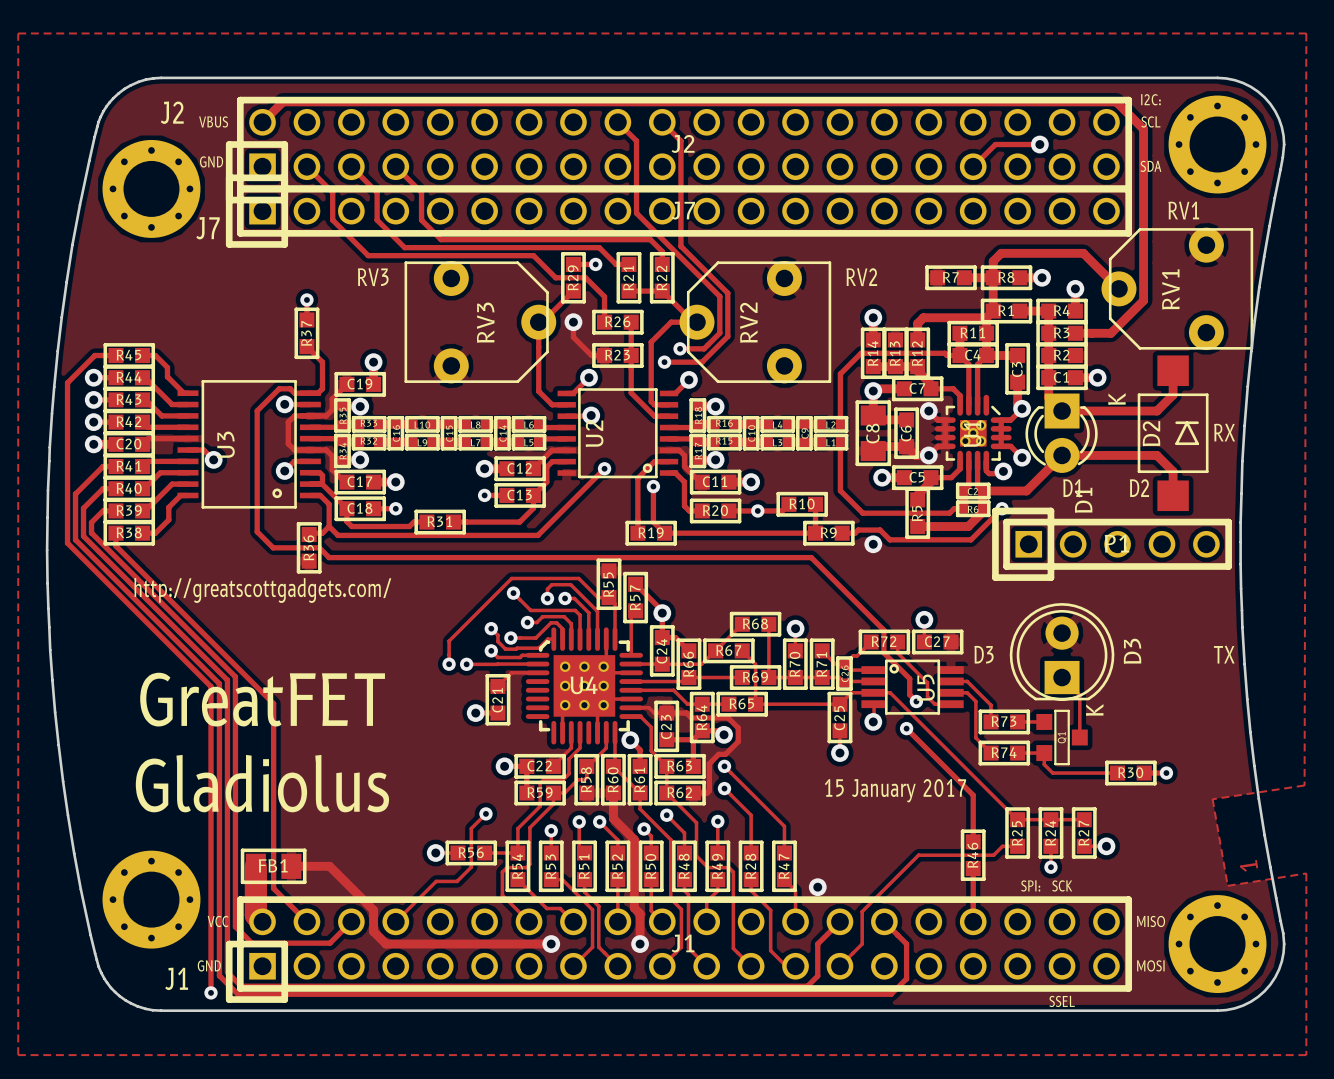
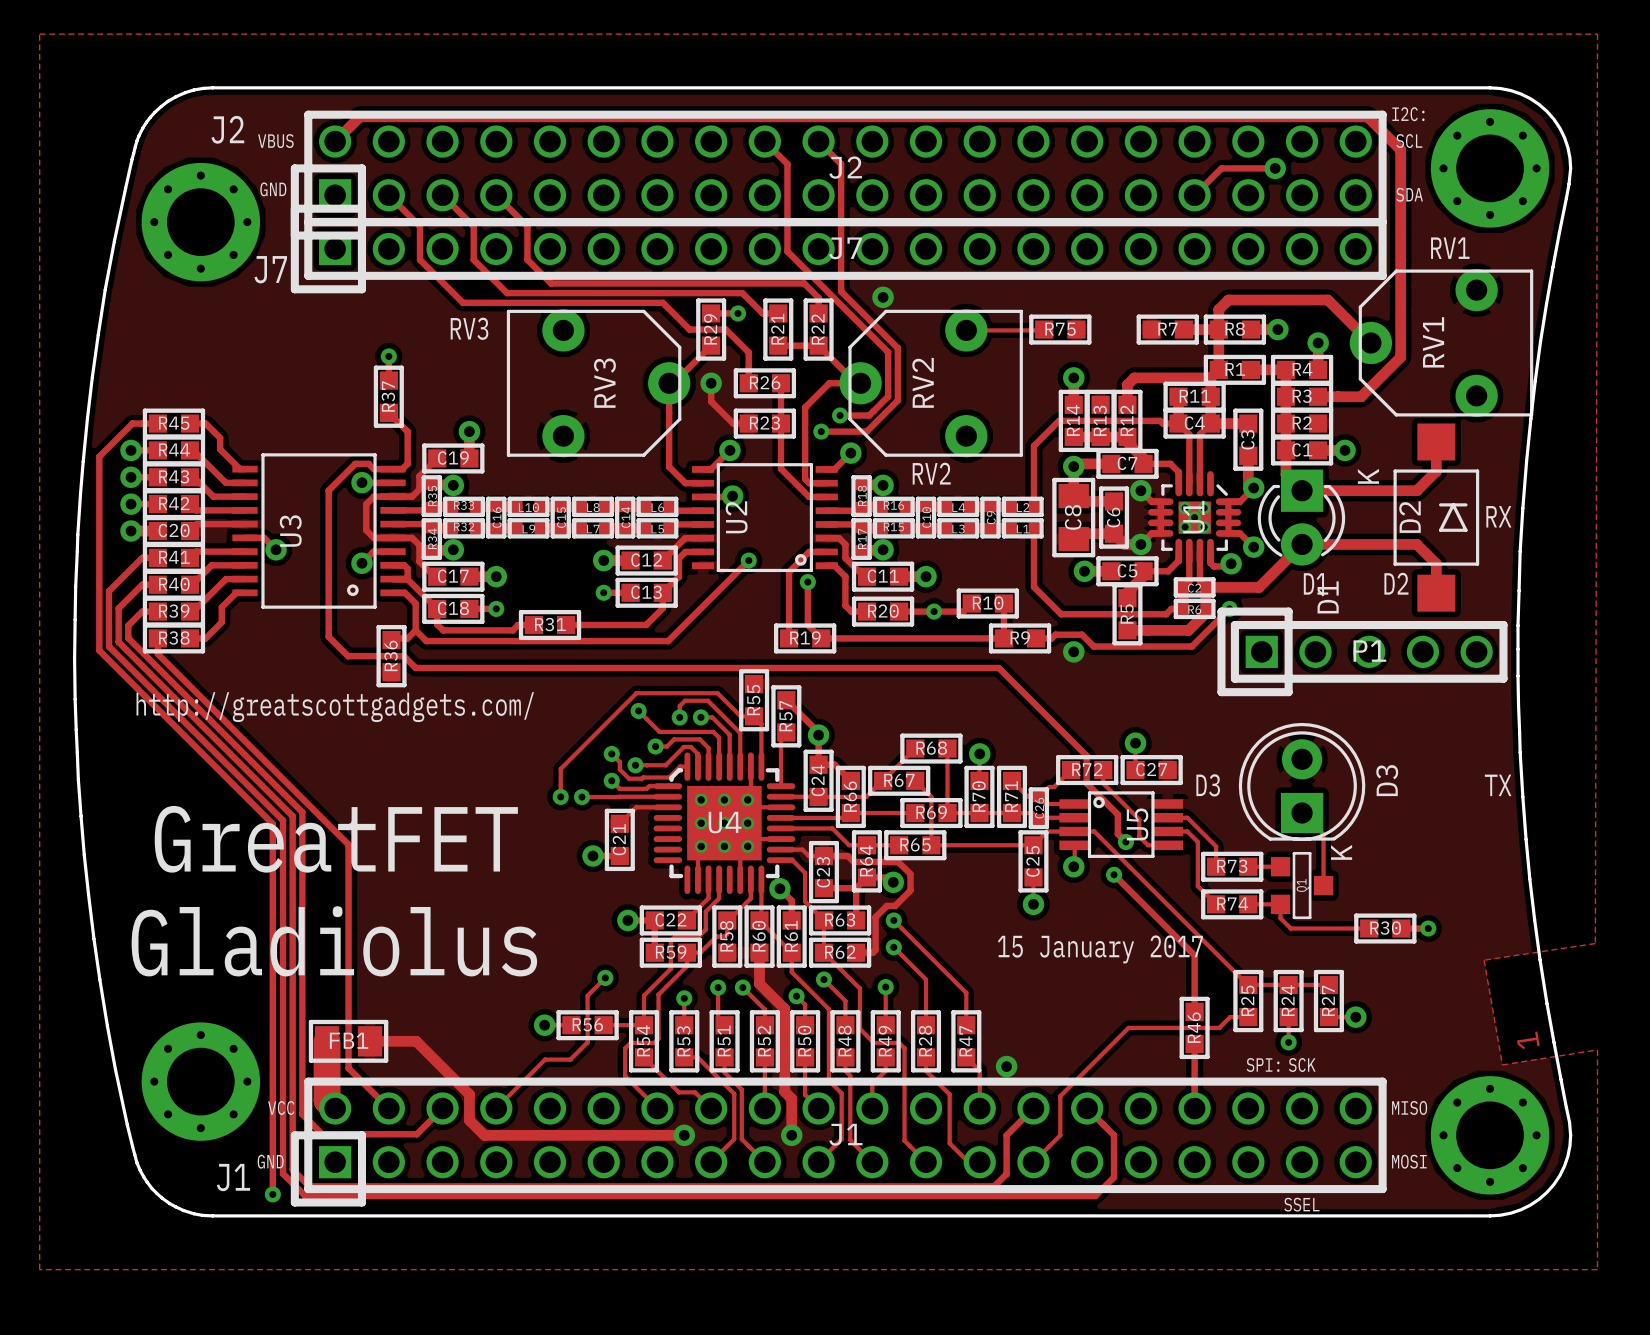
via: none -> (883, 297)
track: none -> (1044, 329) (966, 330)
text position: RV2 (861, 277) -> RV2 (931, 473)
R75: none -> (1060, 329)

